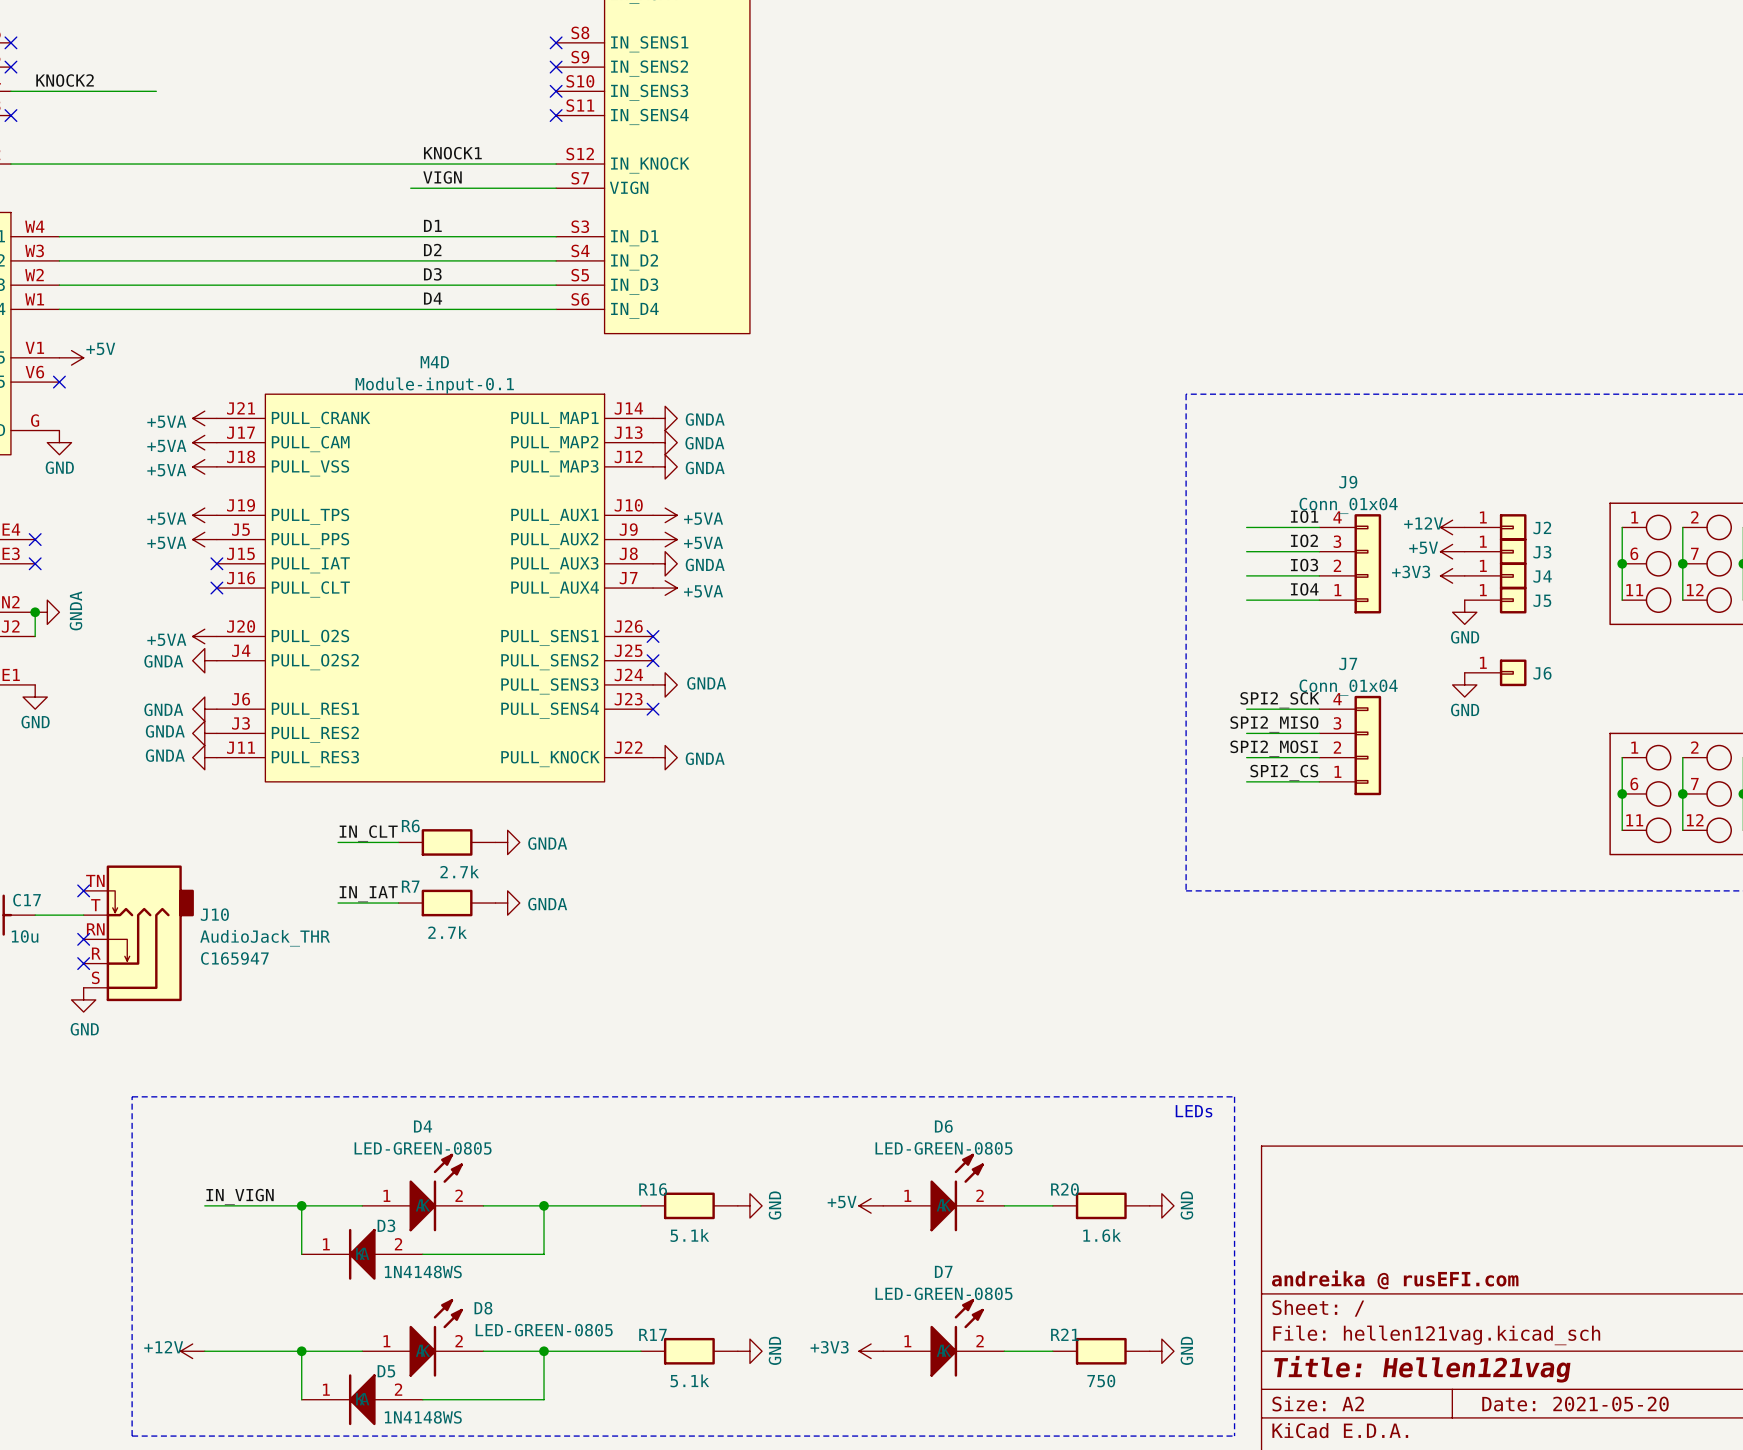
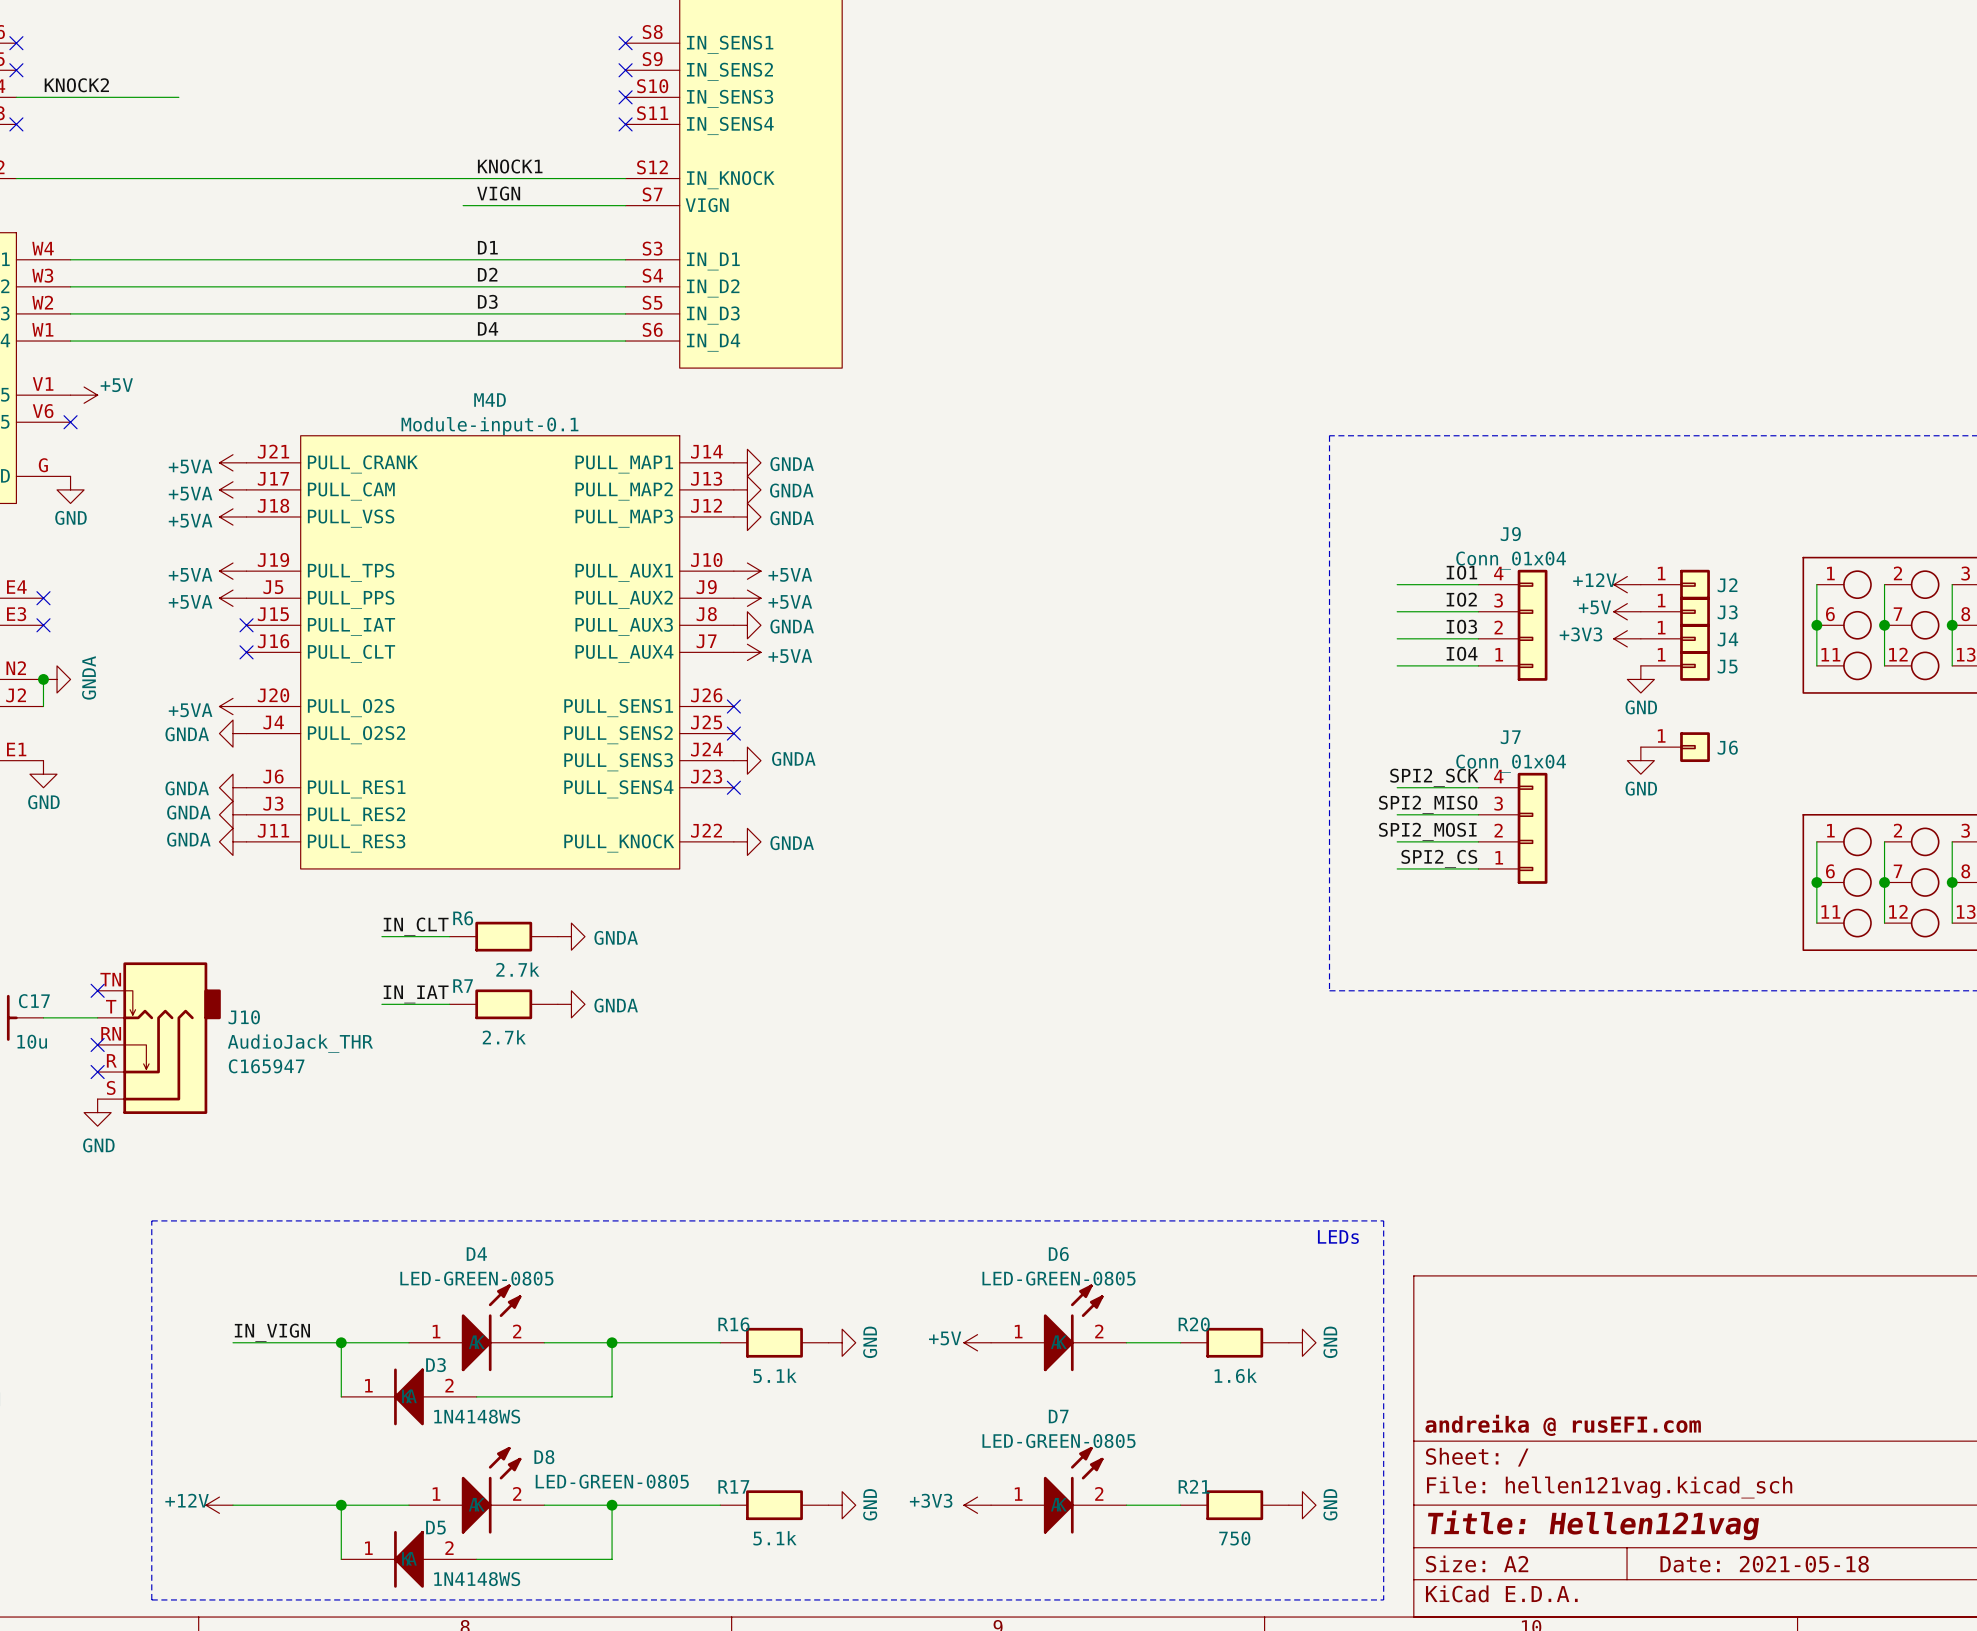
title block: Date: 2021-05-20 (1575, 1404) -> Date: 2021-05-18 (1764, 1564)

